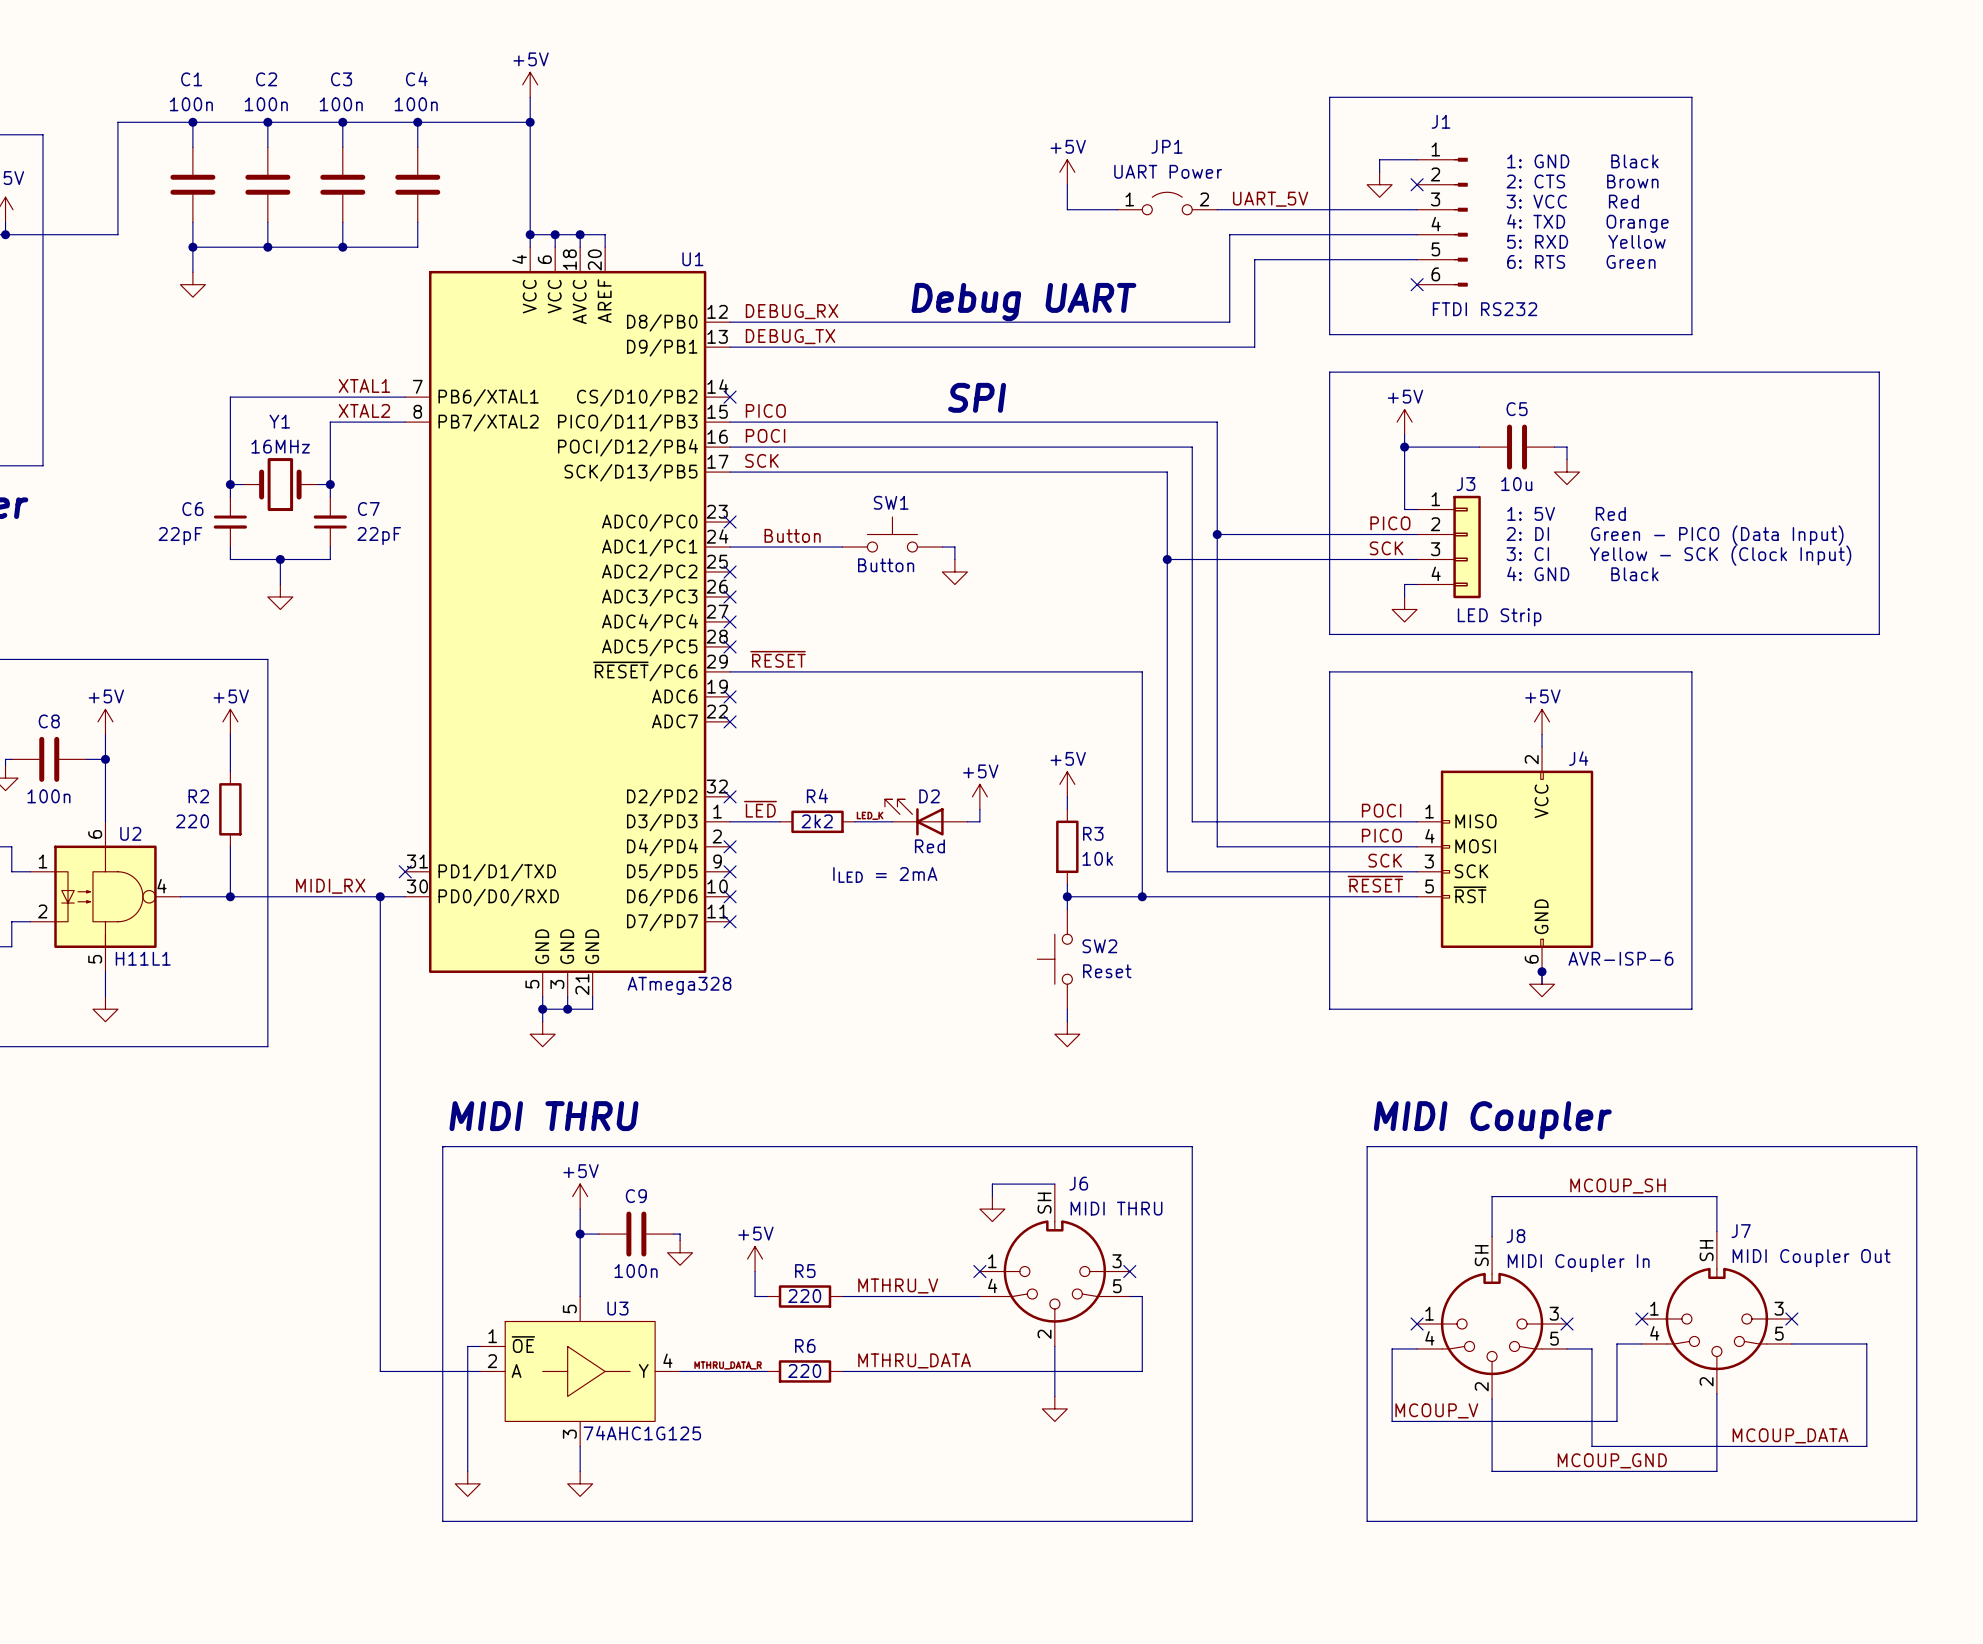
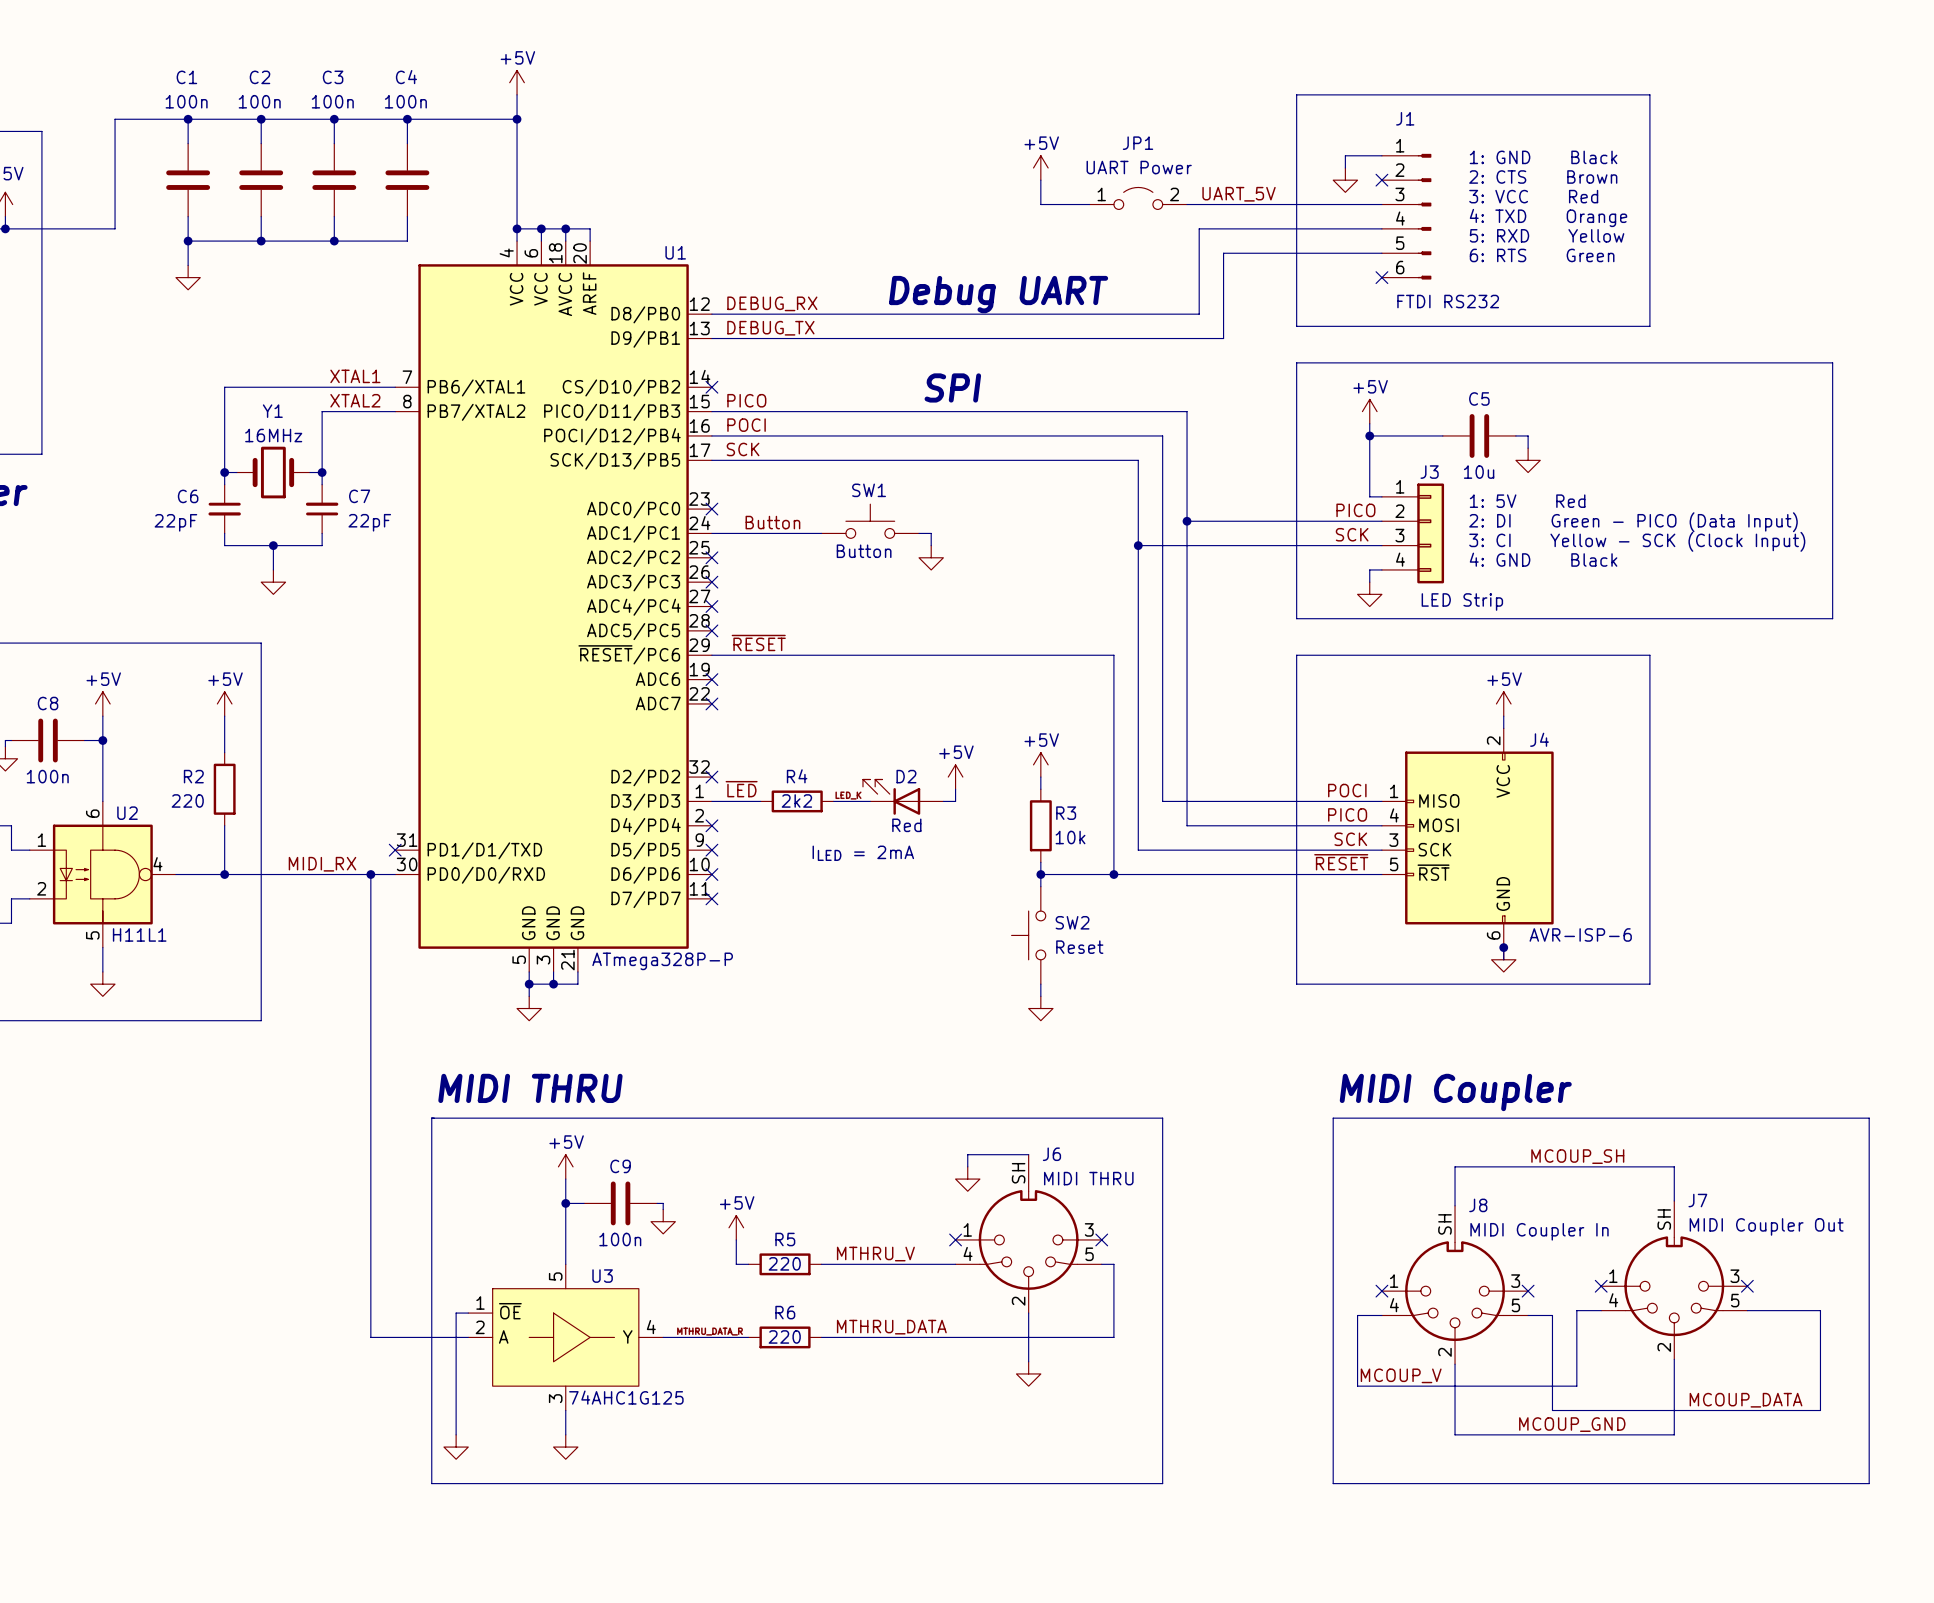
U1 value: ATmega328 (679, 985) -> ATmega328P-P (662, 961)

